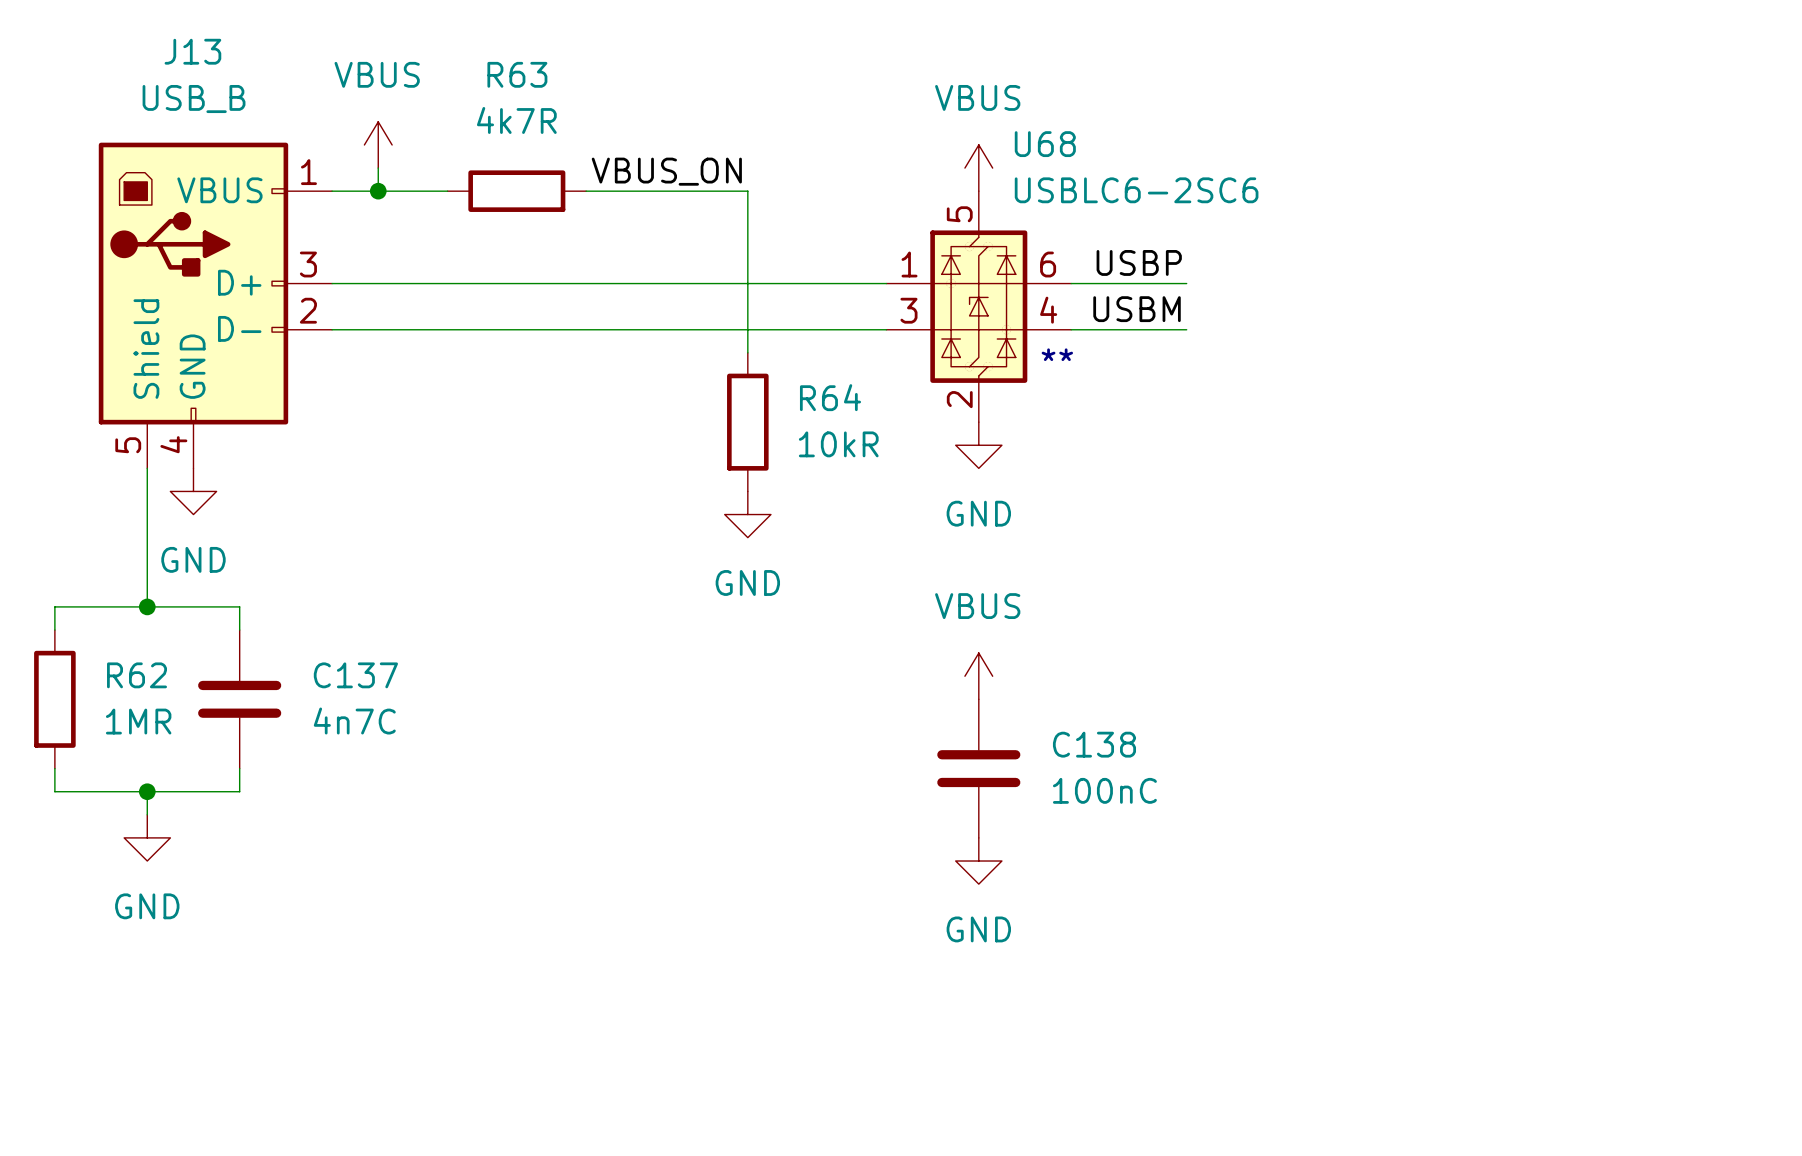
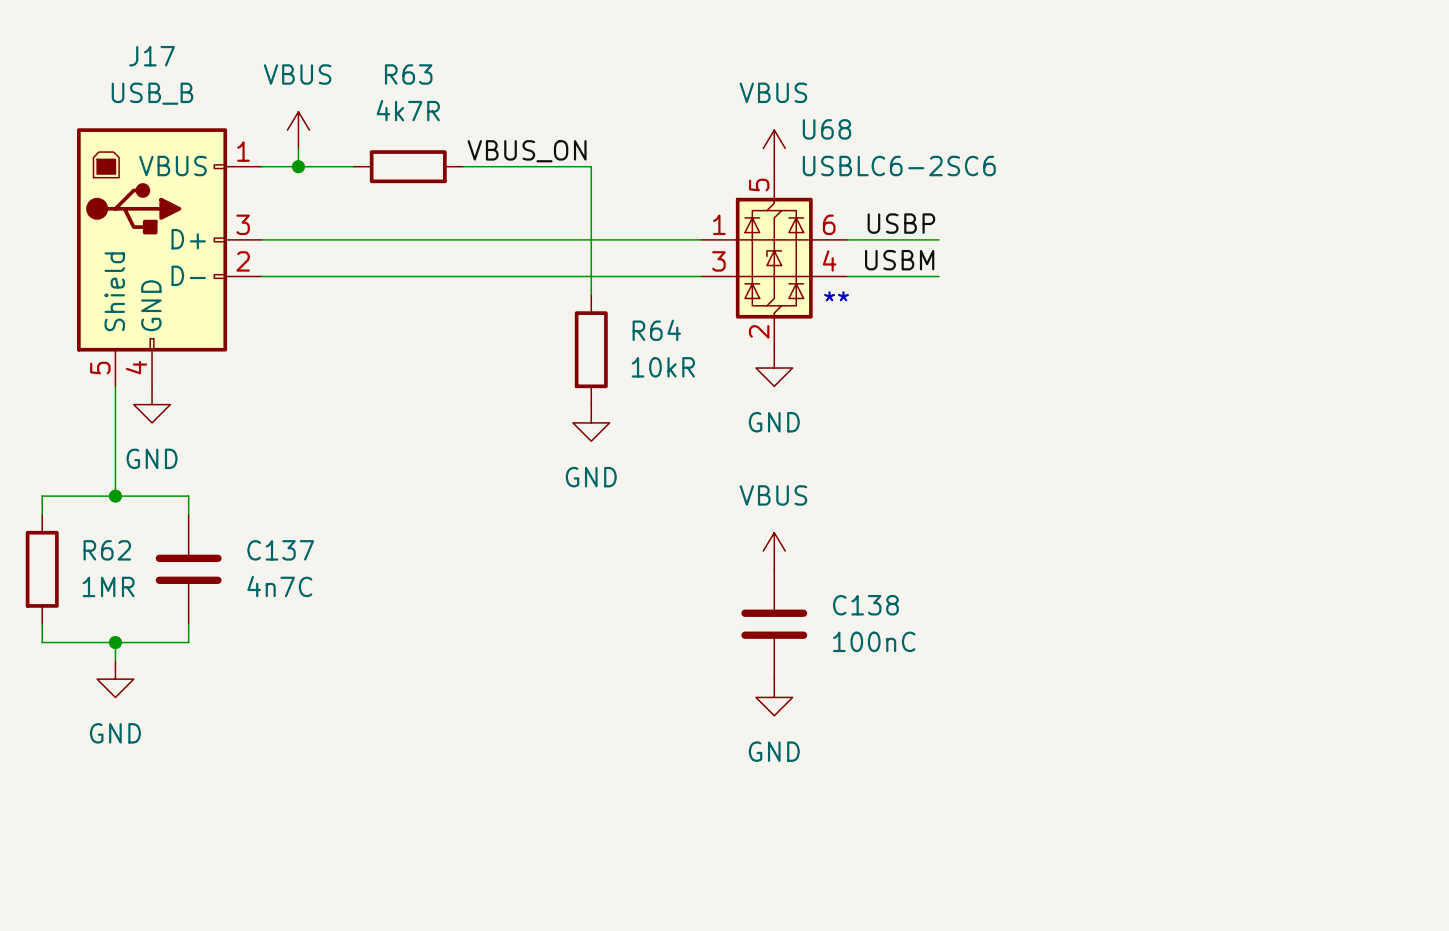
J13 name: J13 (192, 51) -> J17 (152, 56)

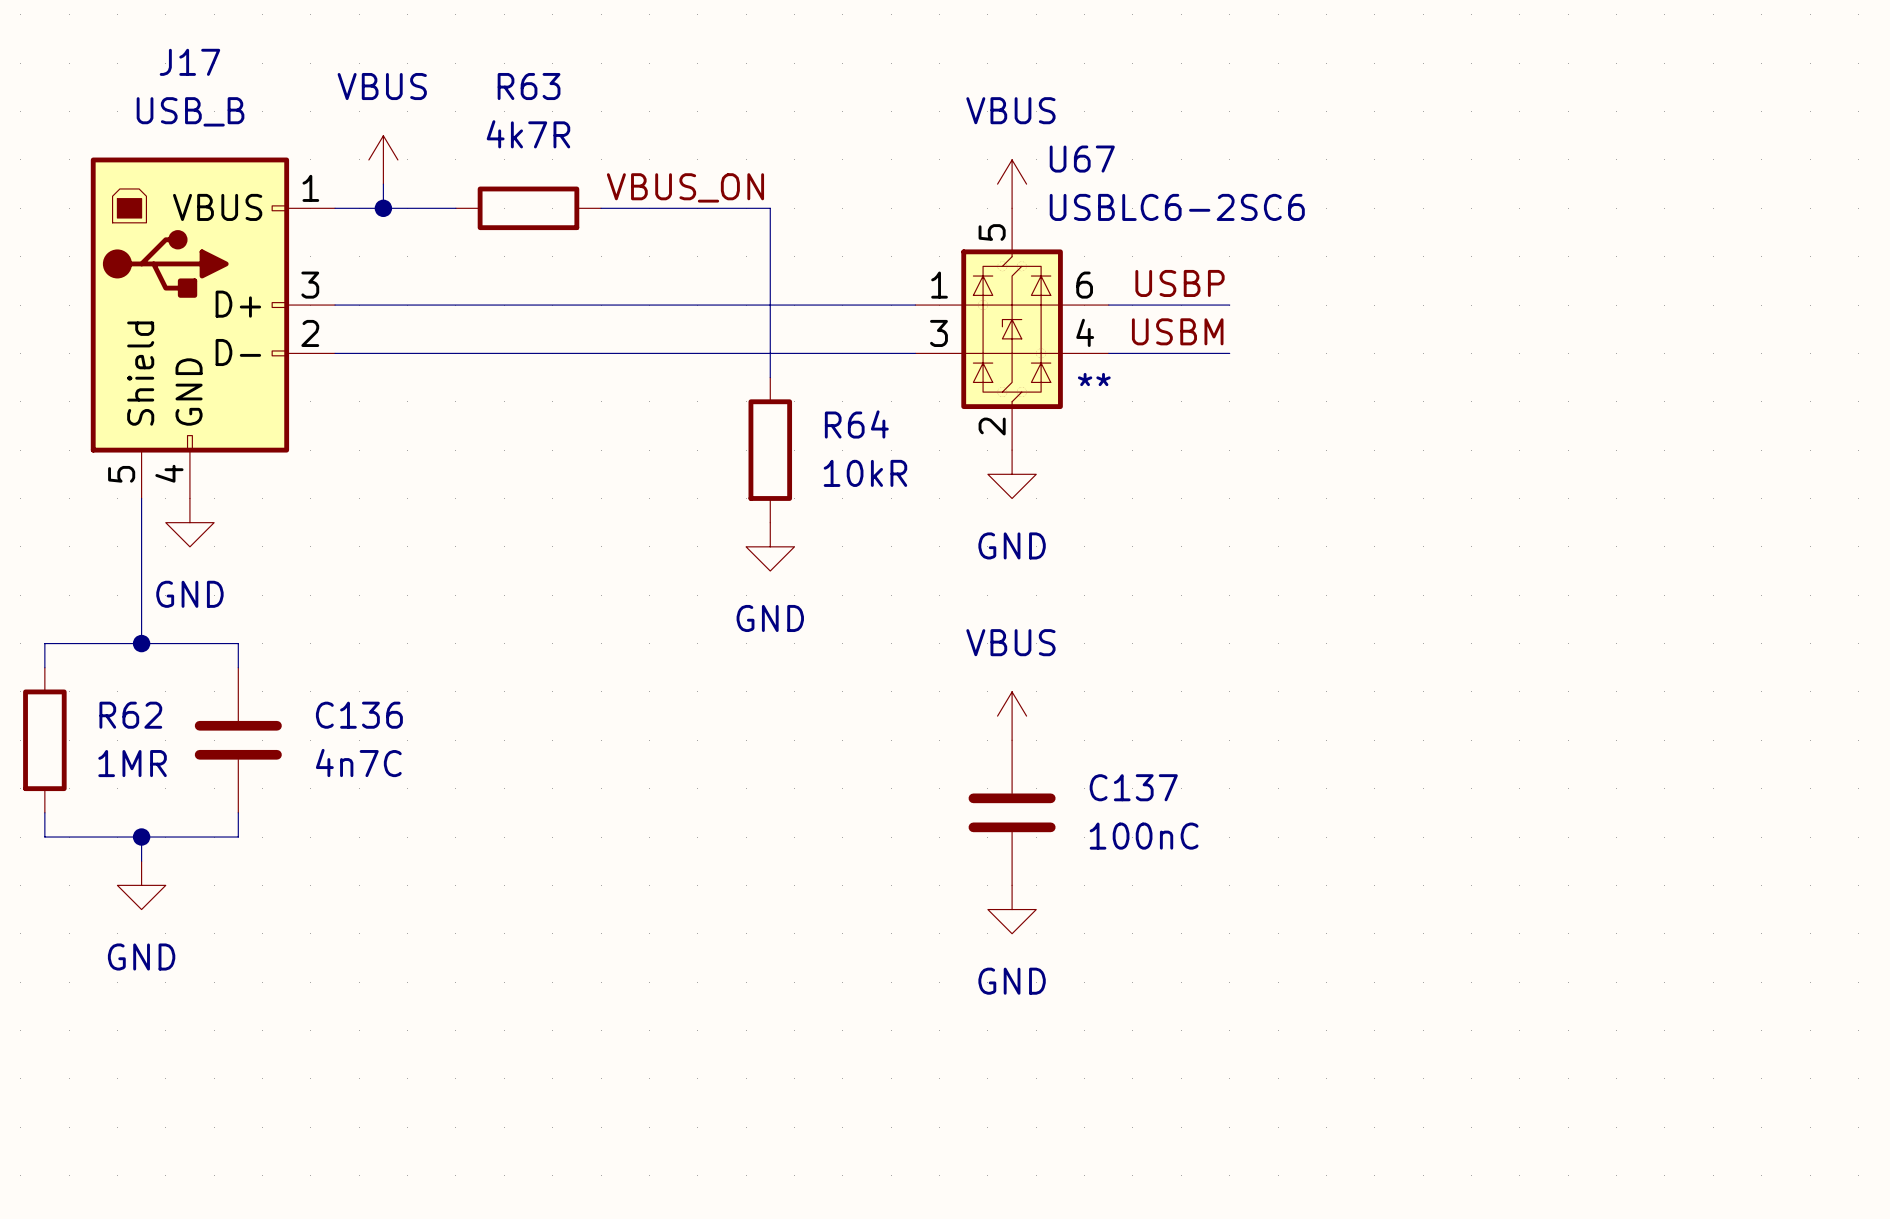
U68 name: U68 (826, 129) -> U67 (1082, 159)
C137 name: C137 (280, 550) -> C136 (359, 715)
C138 name: C138 (865, 605) -> C137 (1133, 787)

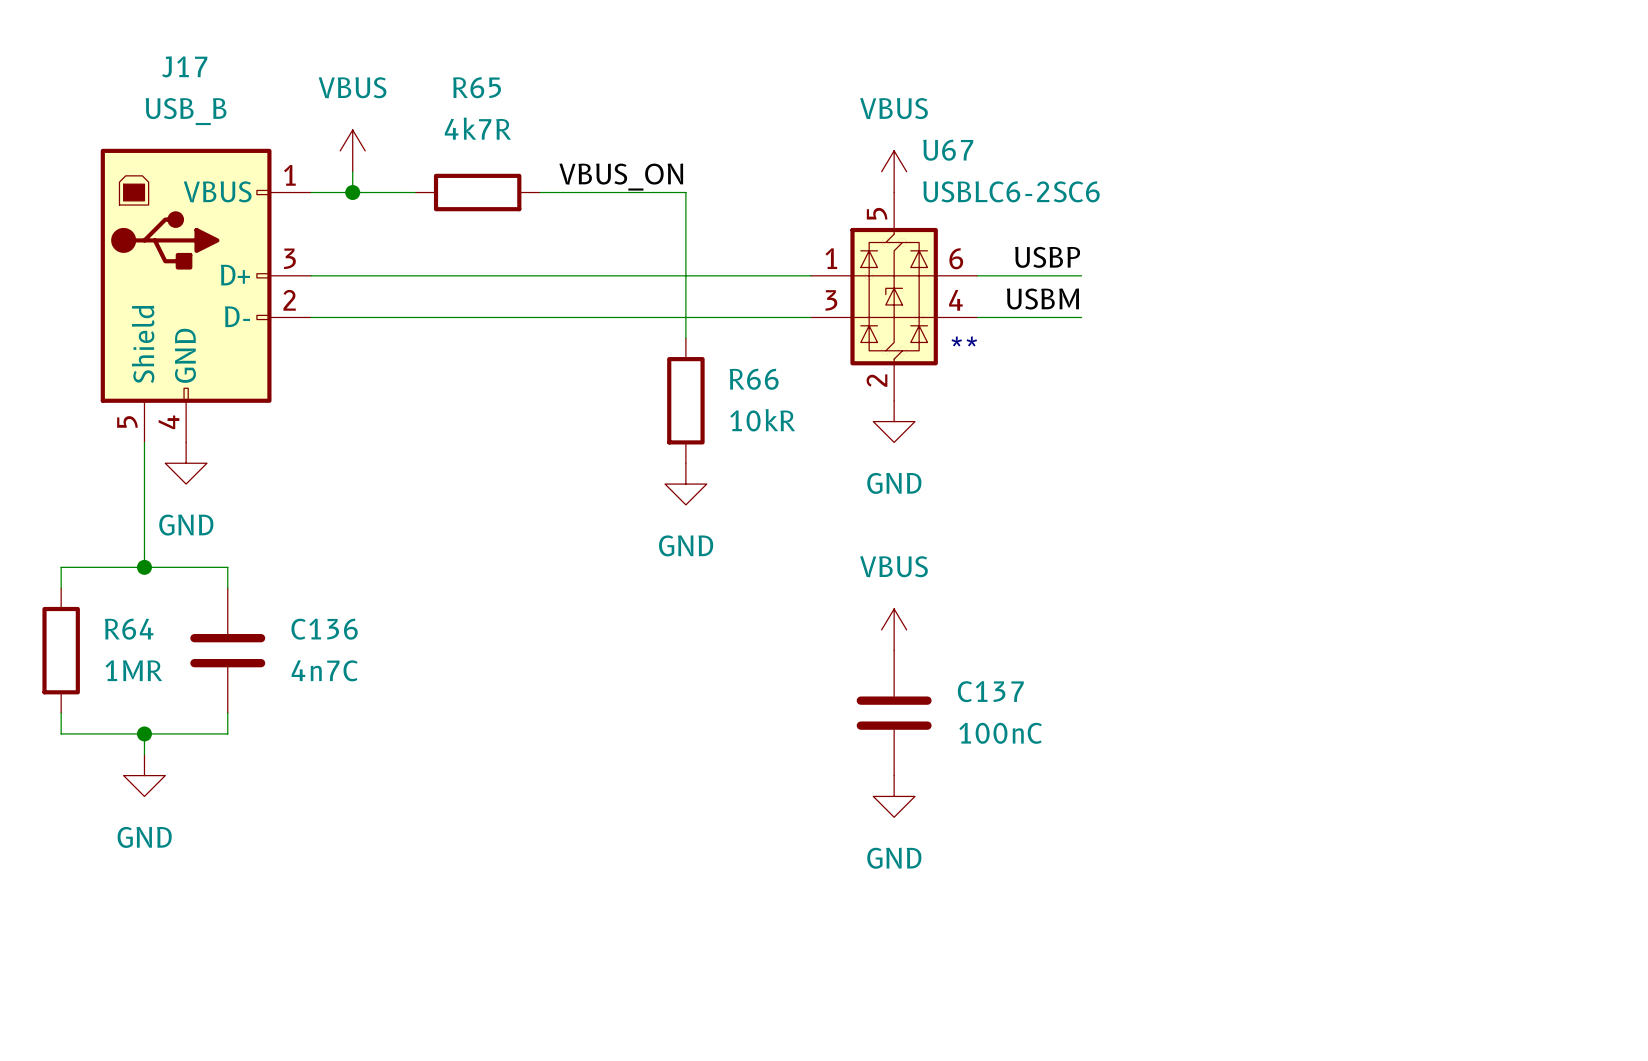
R63 name: R63 (529, 86) -> R65 (477, 87)
R64 name: R64 (856, 424) -> R66 (754, 379)
R62 name: R62 (130, 715) -> R64 (129, 629)

